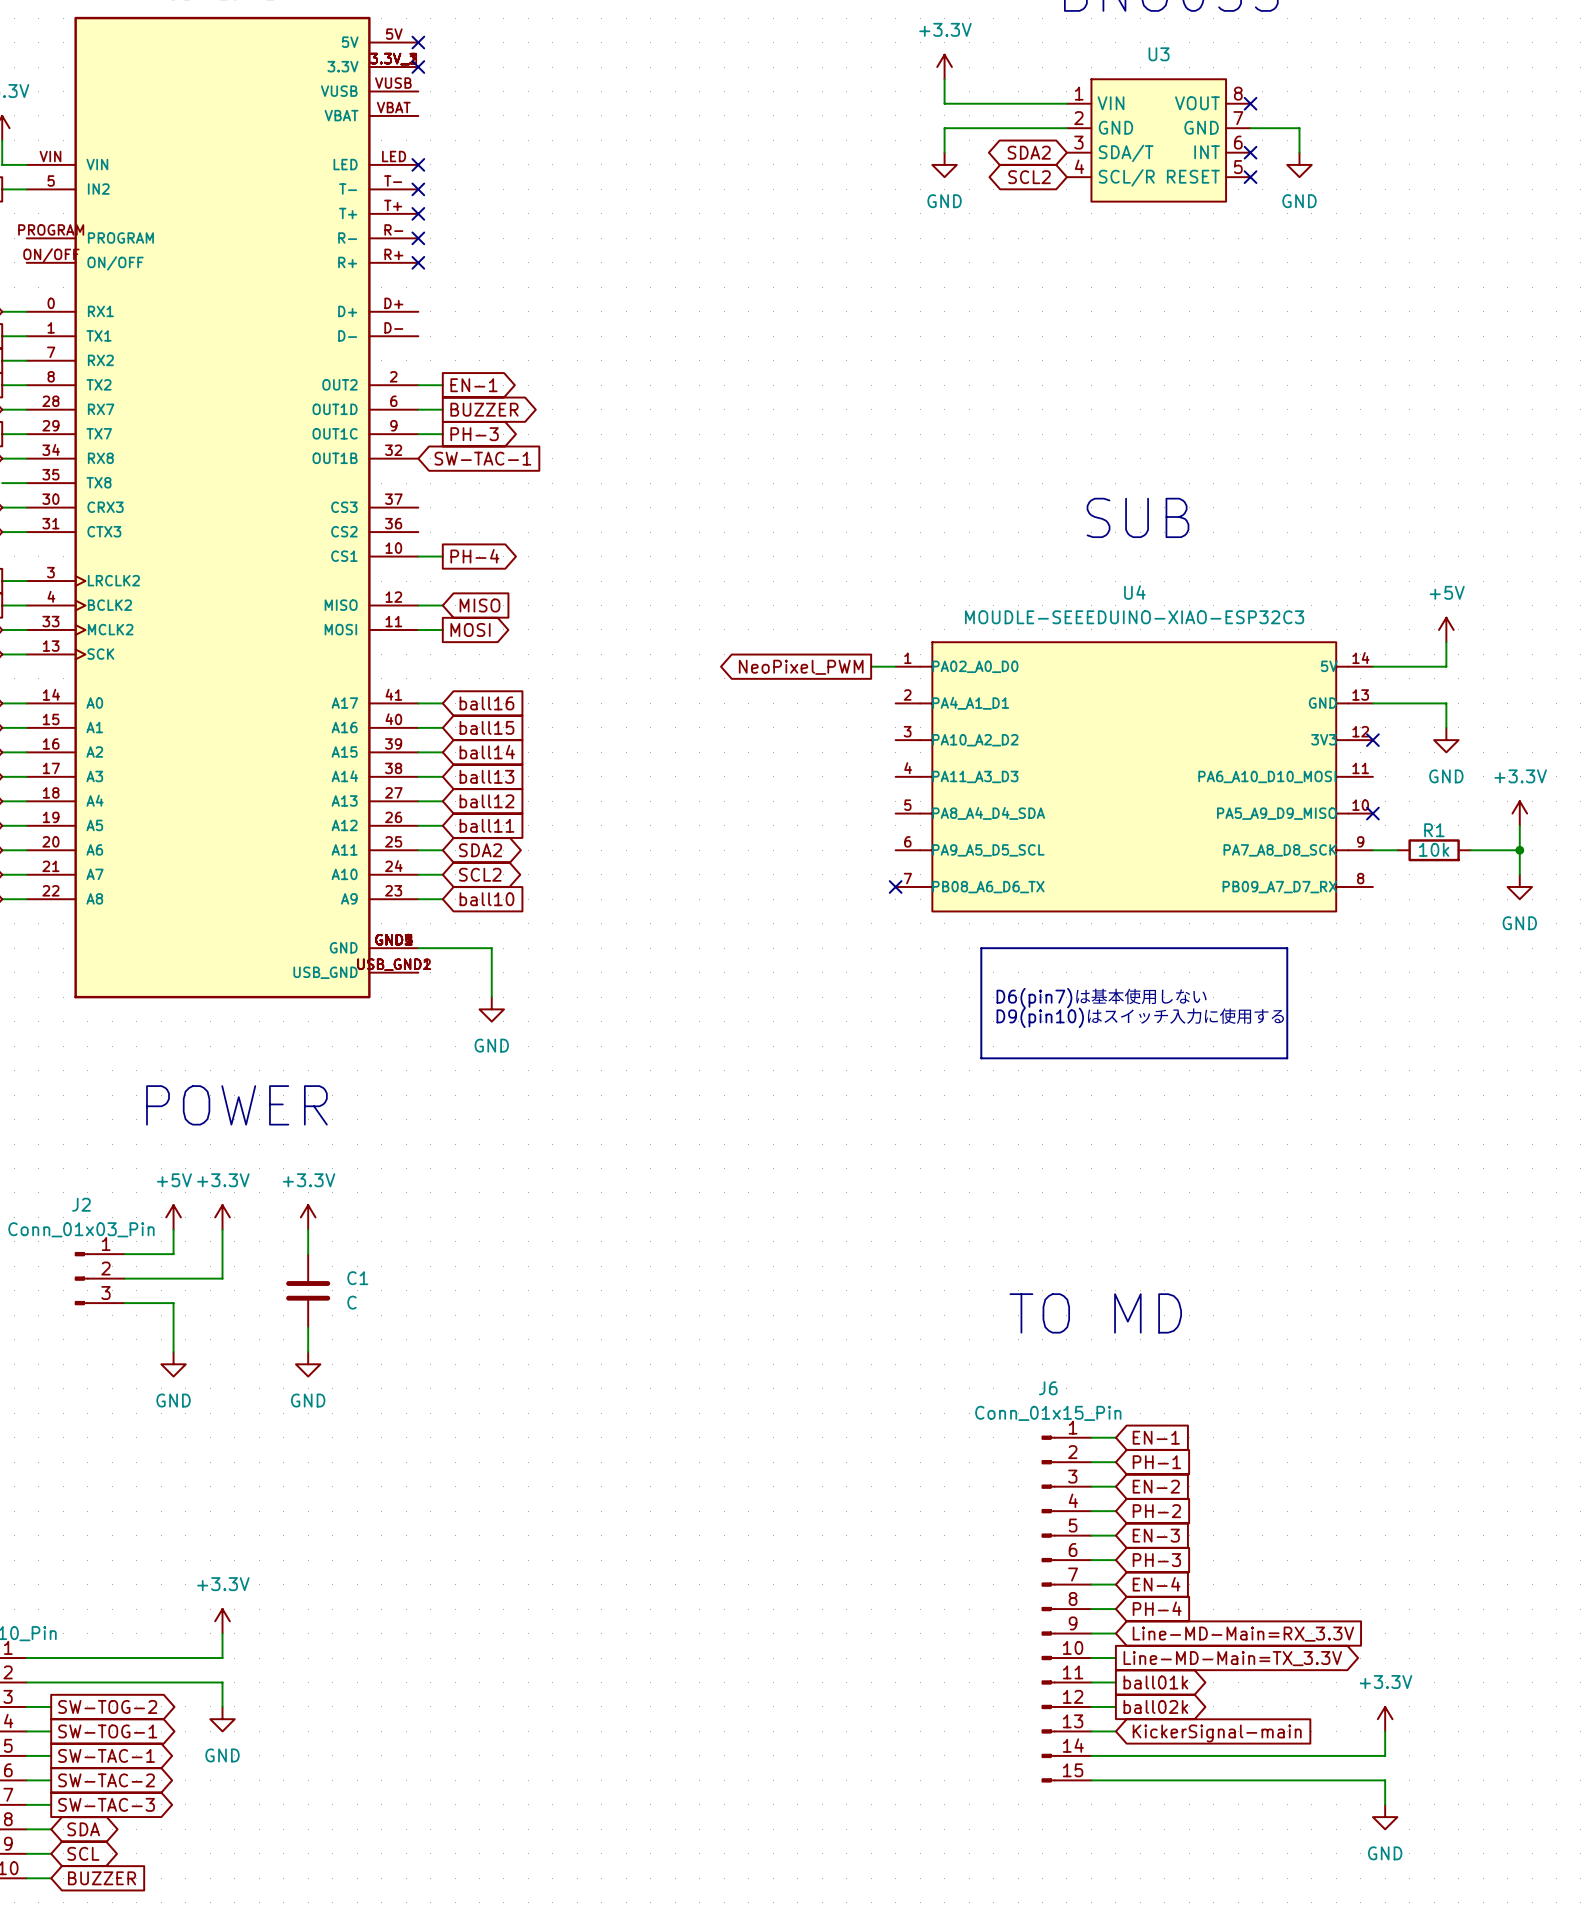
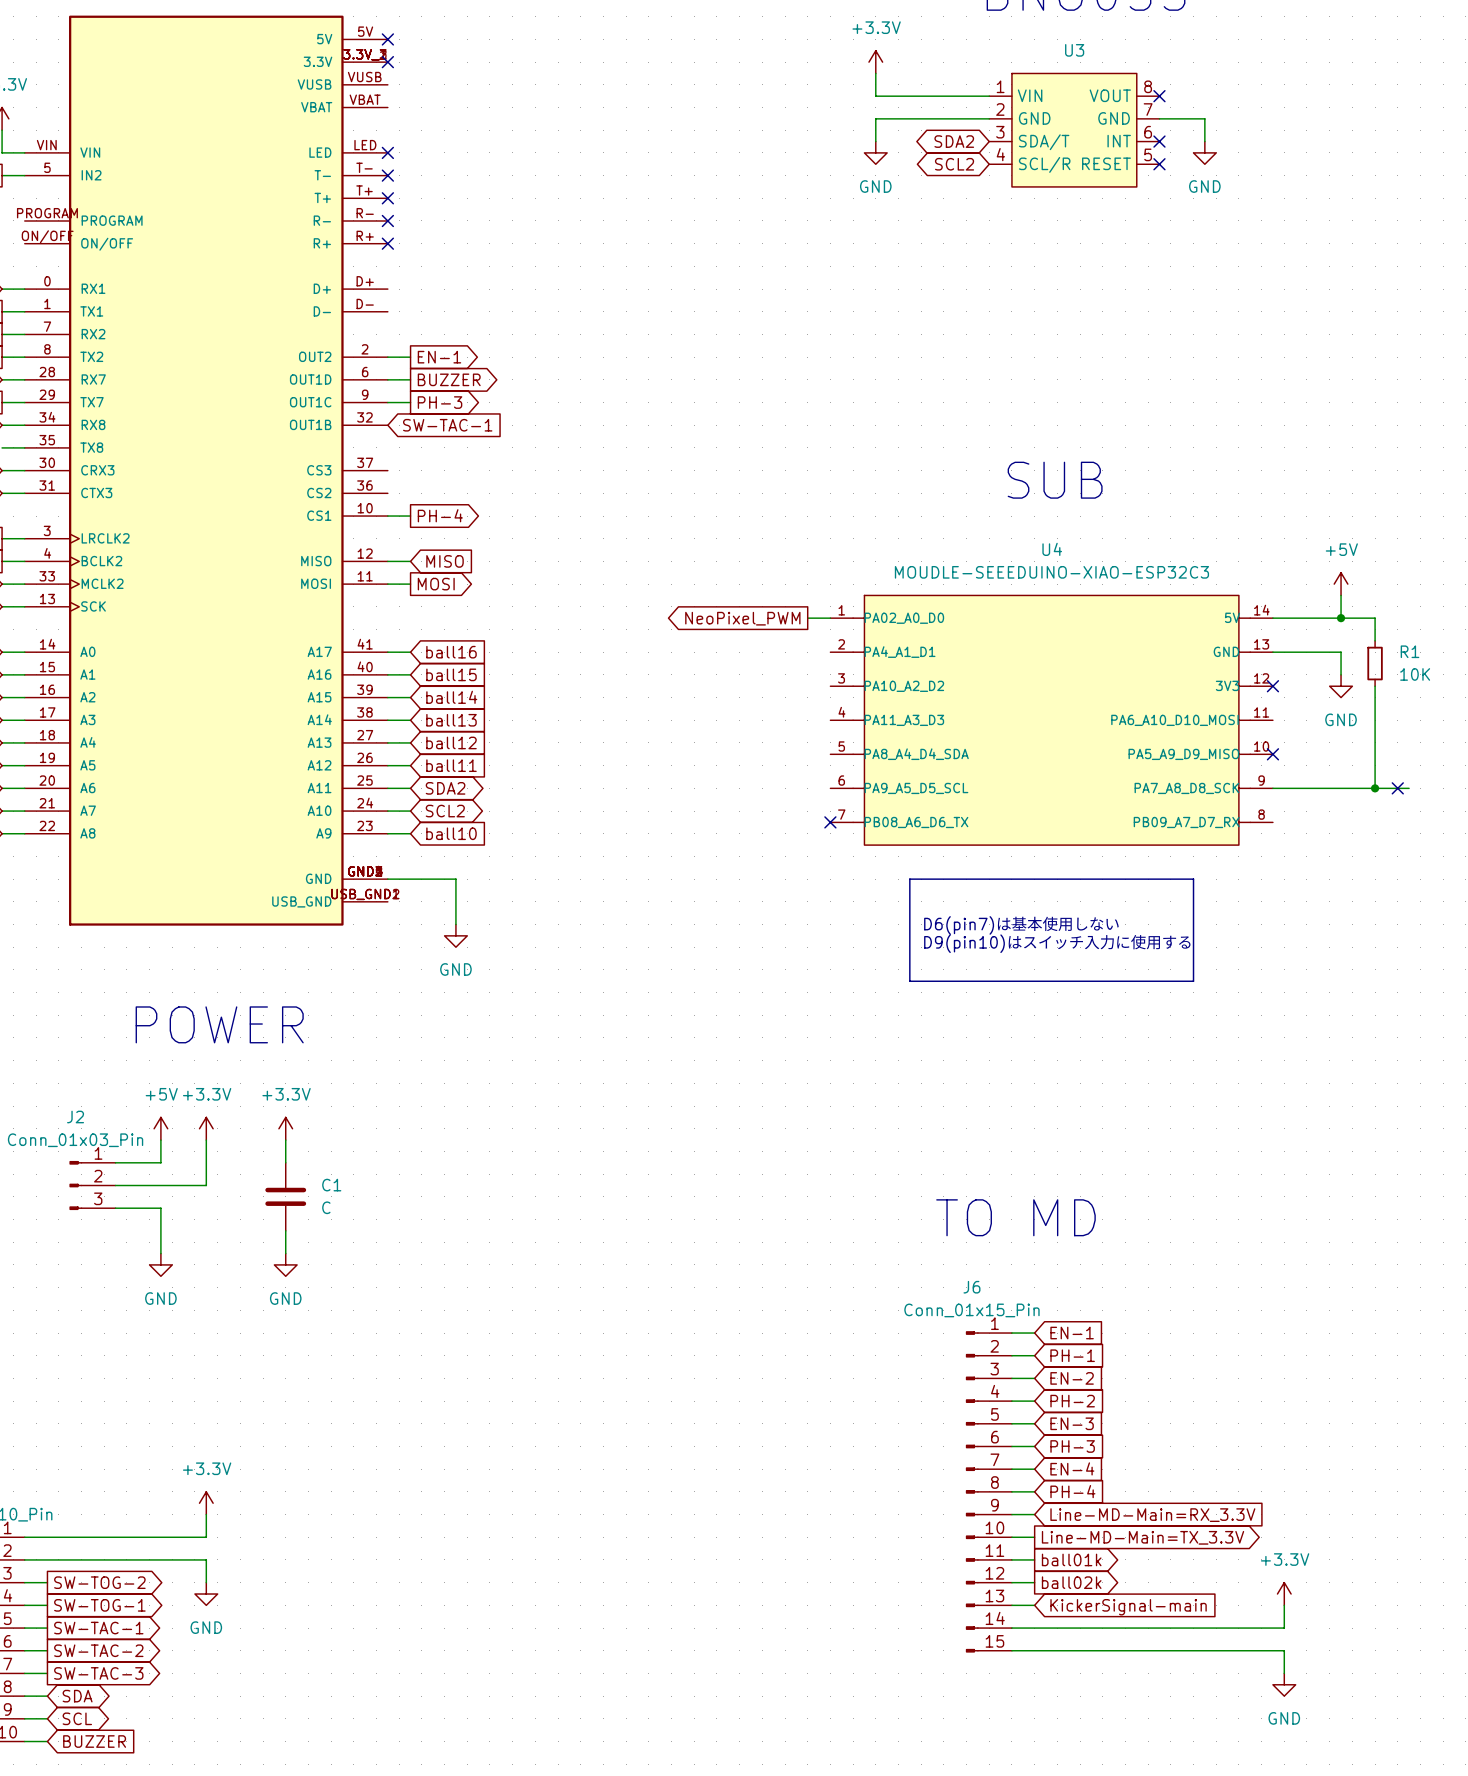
wire: none -> (1341, 618) (1375, 618) (1375, 640)
junction: none -> (1341, 618)
wire: none -> (1375, 686) (1375, 788)
power symbol: +3.3V (1519, 813) -> none
wire: (1519, 825) (1519, 874) -> none
R1 name position: R1 (1434, 830) -> R1 (1410, 651)
R1 symbol: [1397, 839, 1471, 862] -> [1367, 640, 1383, 687]
R1 value: 10k (1434, 849) -> 10K (1415, 674)
wire: none -> (1295, 788) (1363, 788)
no-connect mark: none -> (1397, 788)
junction position: (1519, 850) -> (1375, 788)
power symbol: GND (1519, 886) -> none

